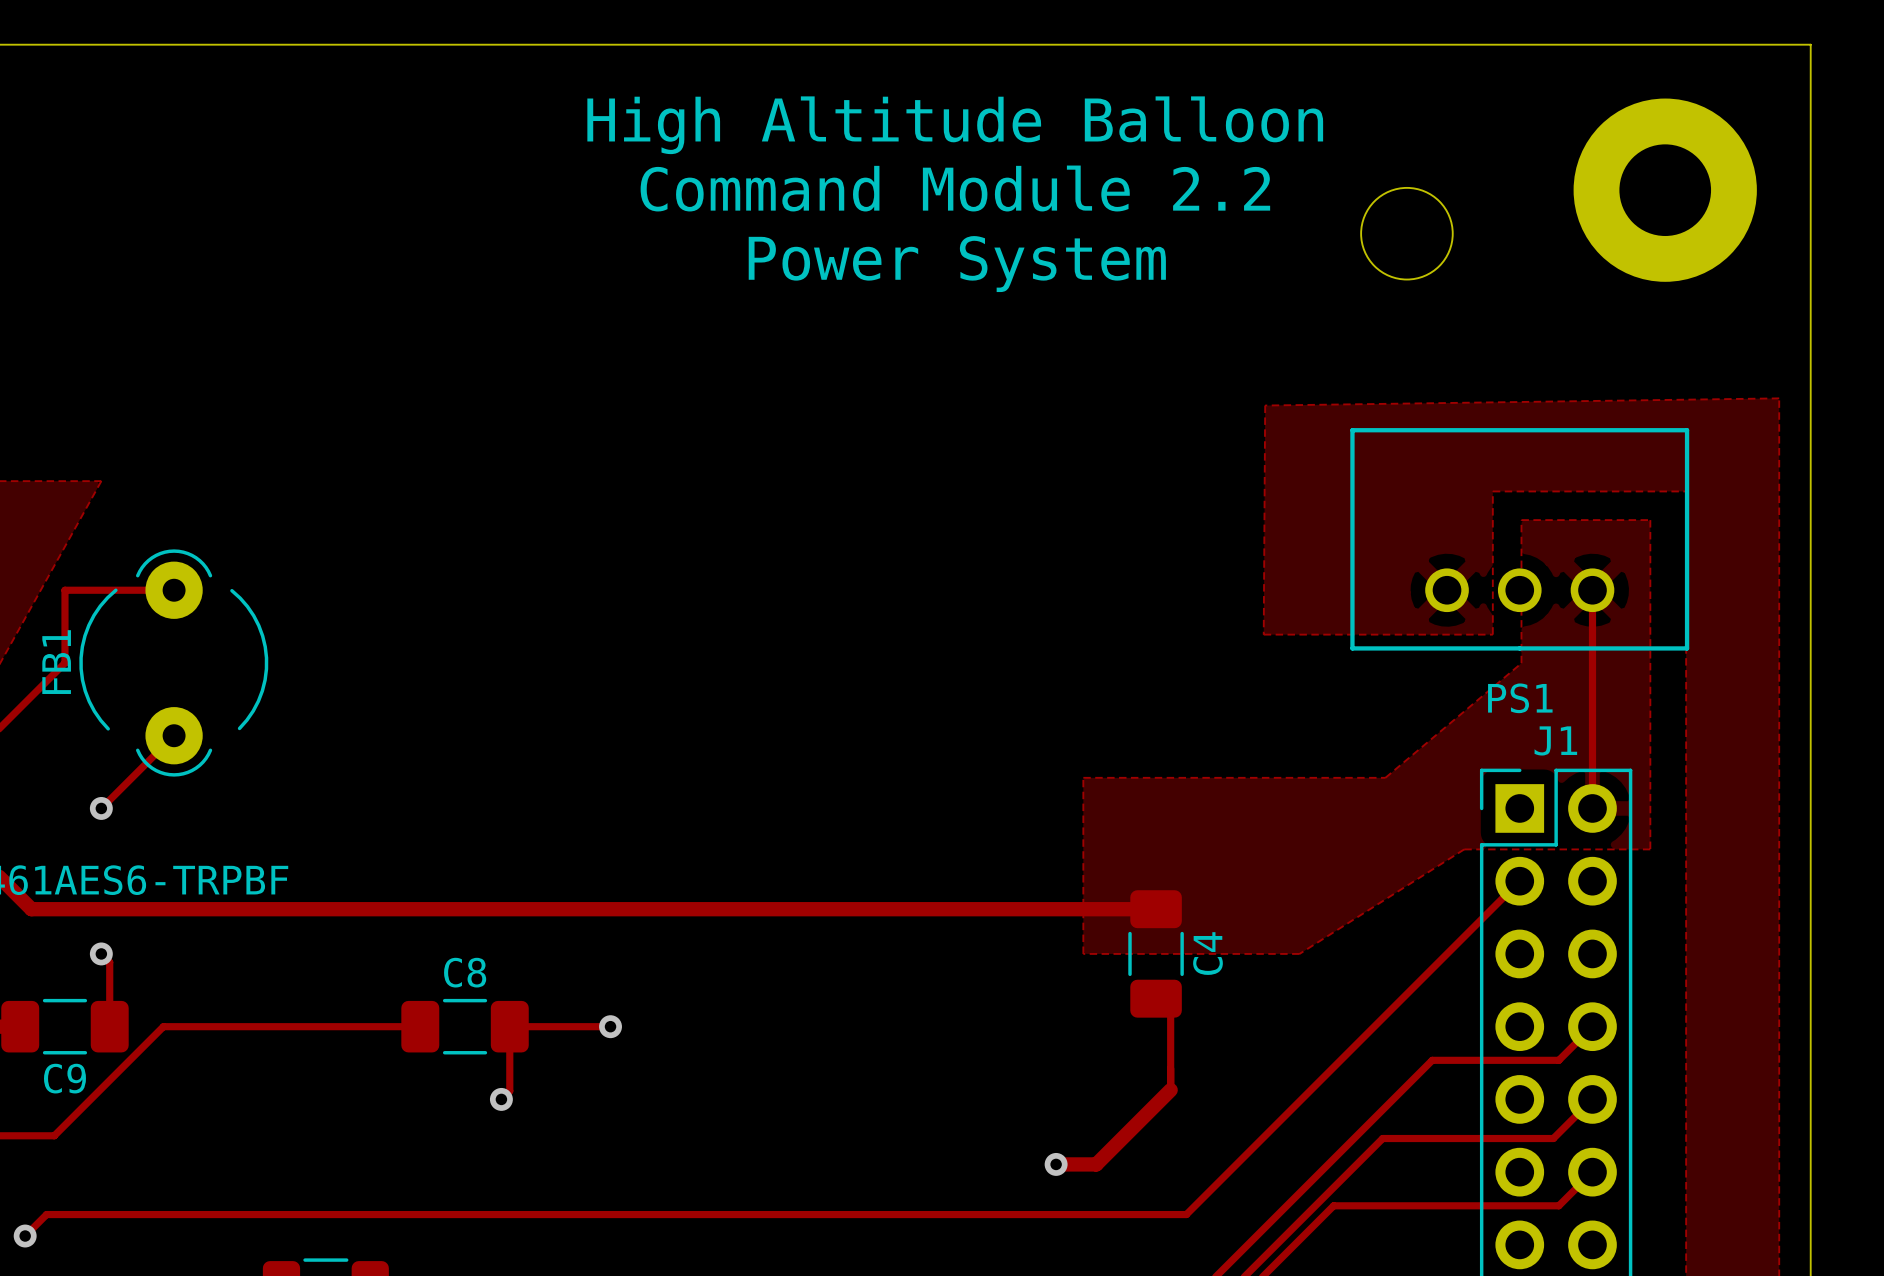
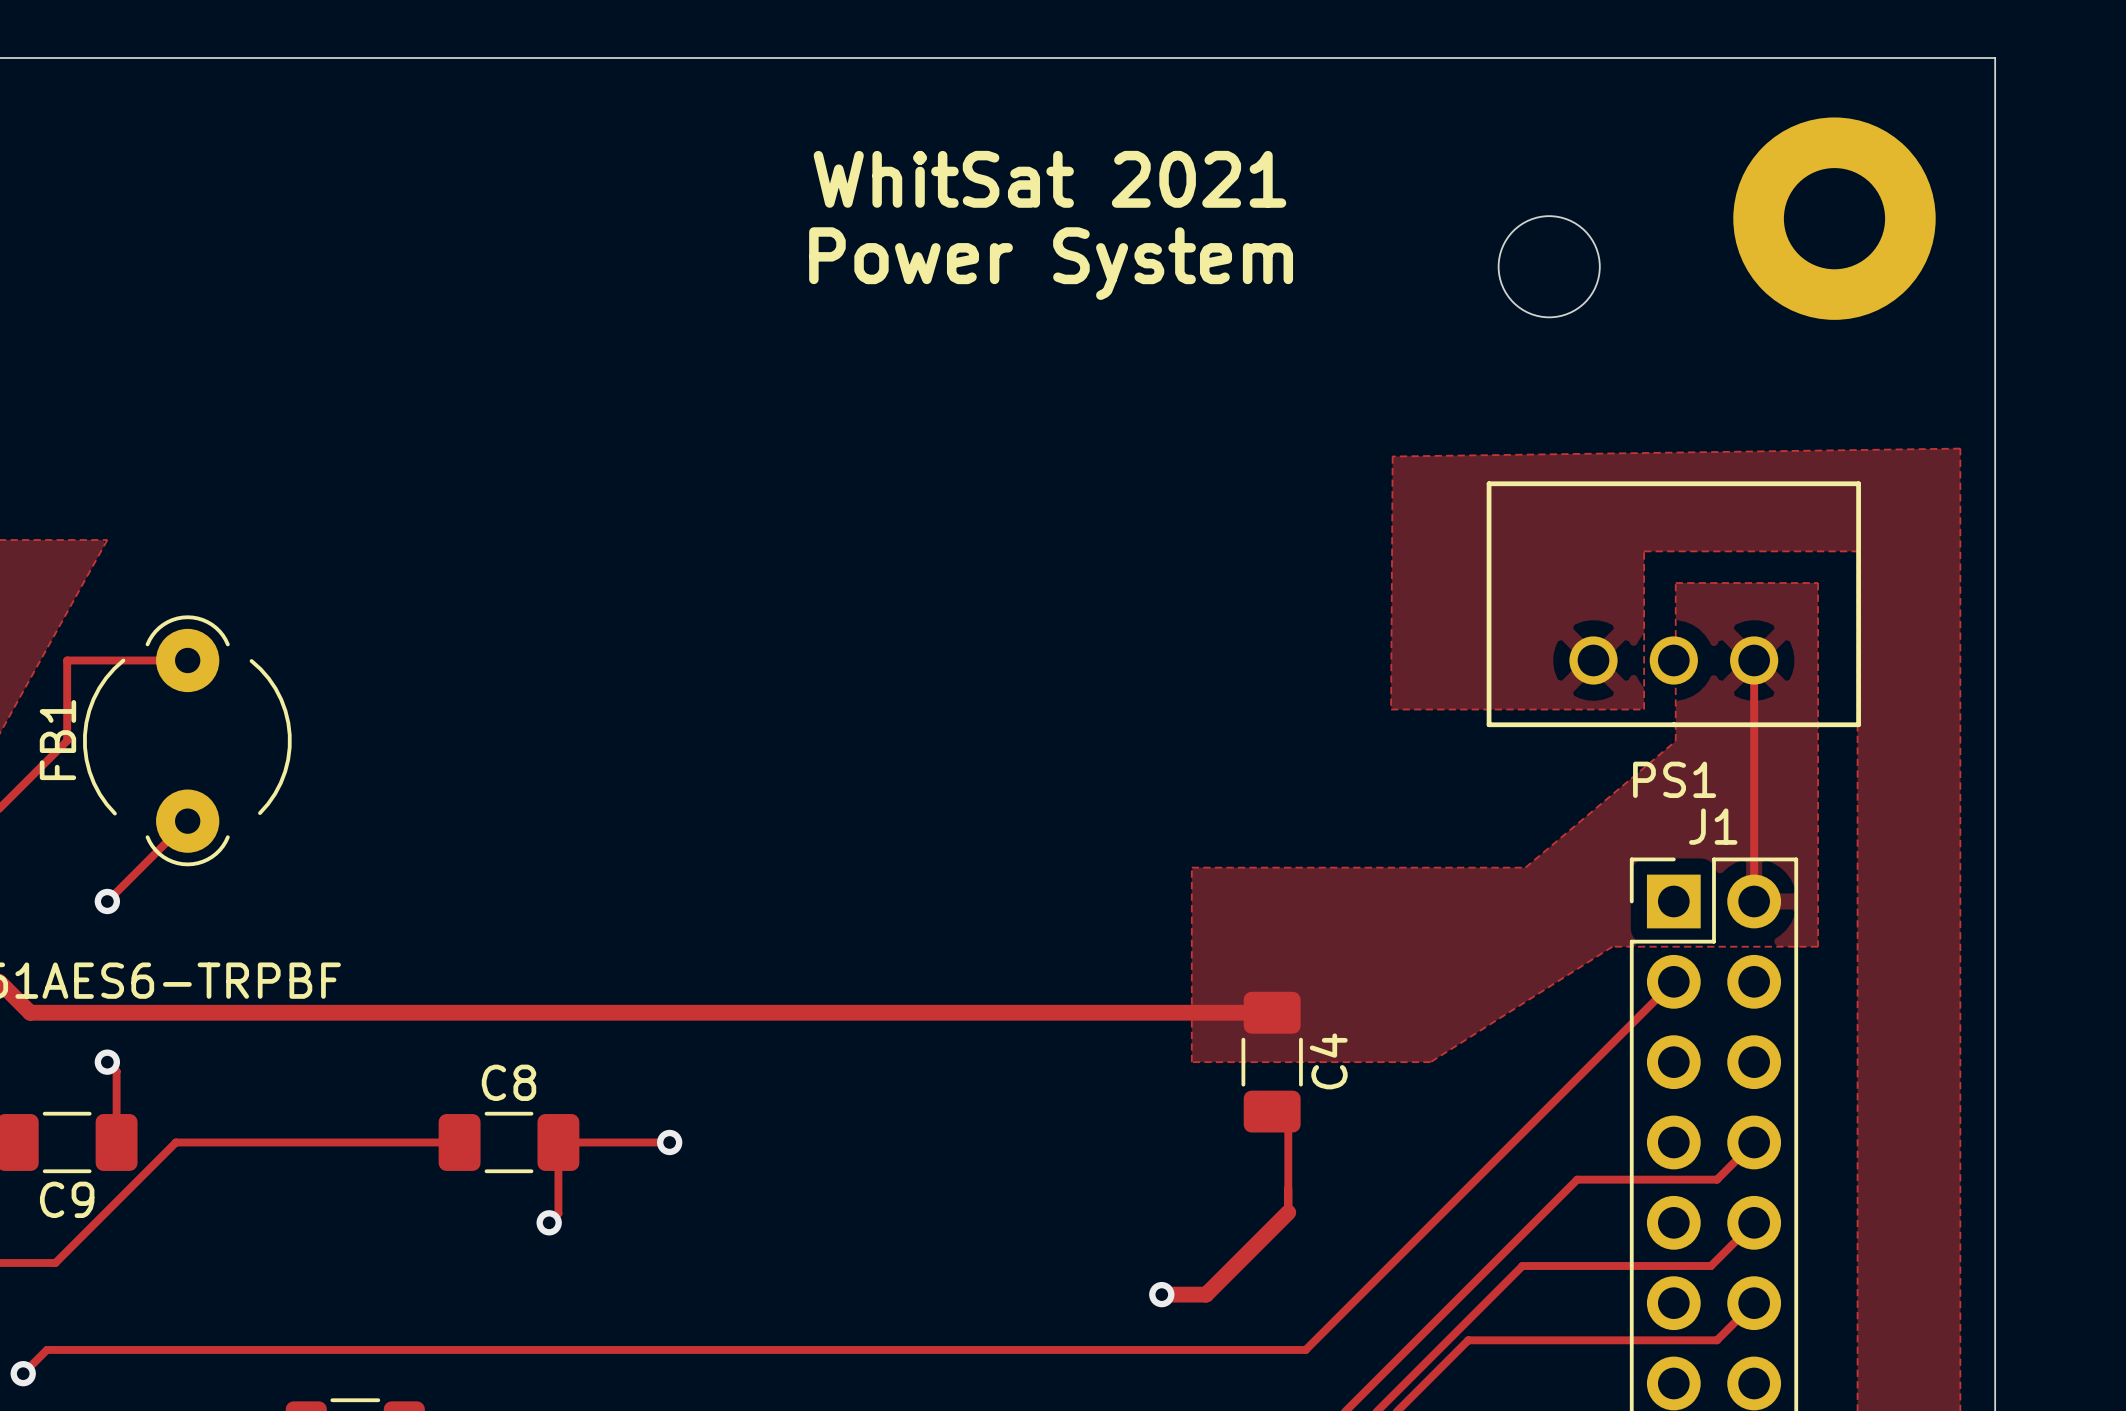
text: High Altitude Balloon (955, 125) -> none
text: none -> WhitSat 2021 (1049, 179)
text: Command Module 2.2 (955, 188) -> none
text position: Power System (957, 264) -> Power System (1051, 263)

